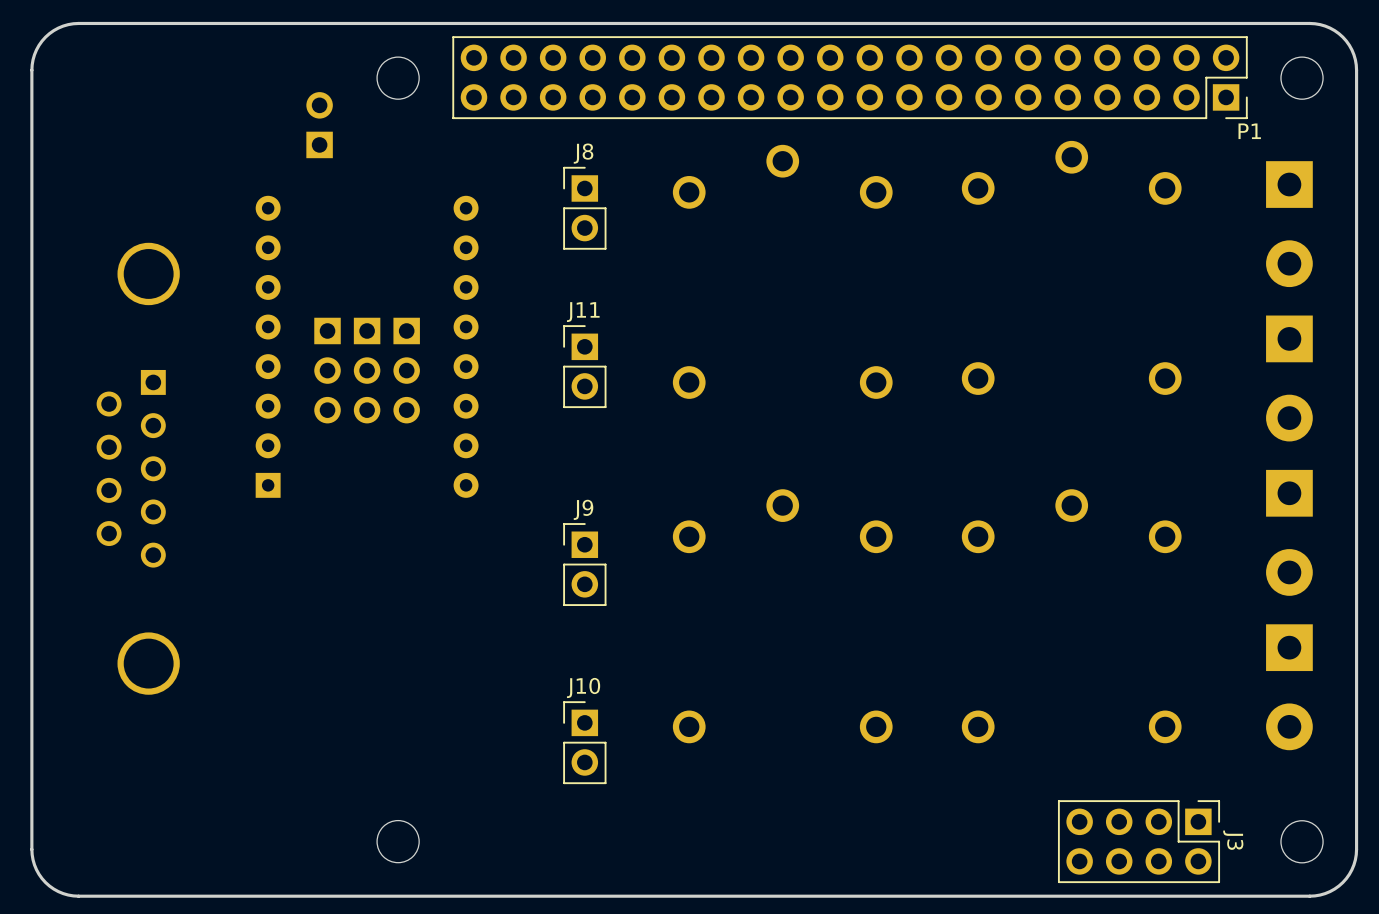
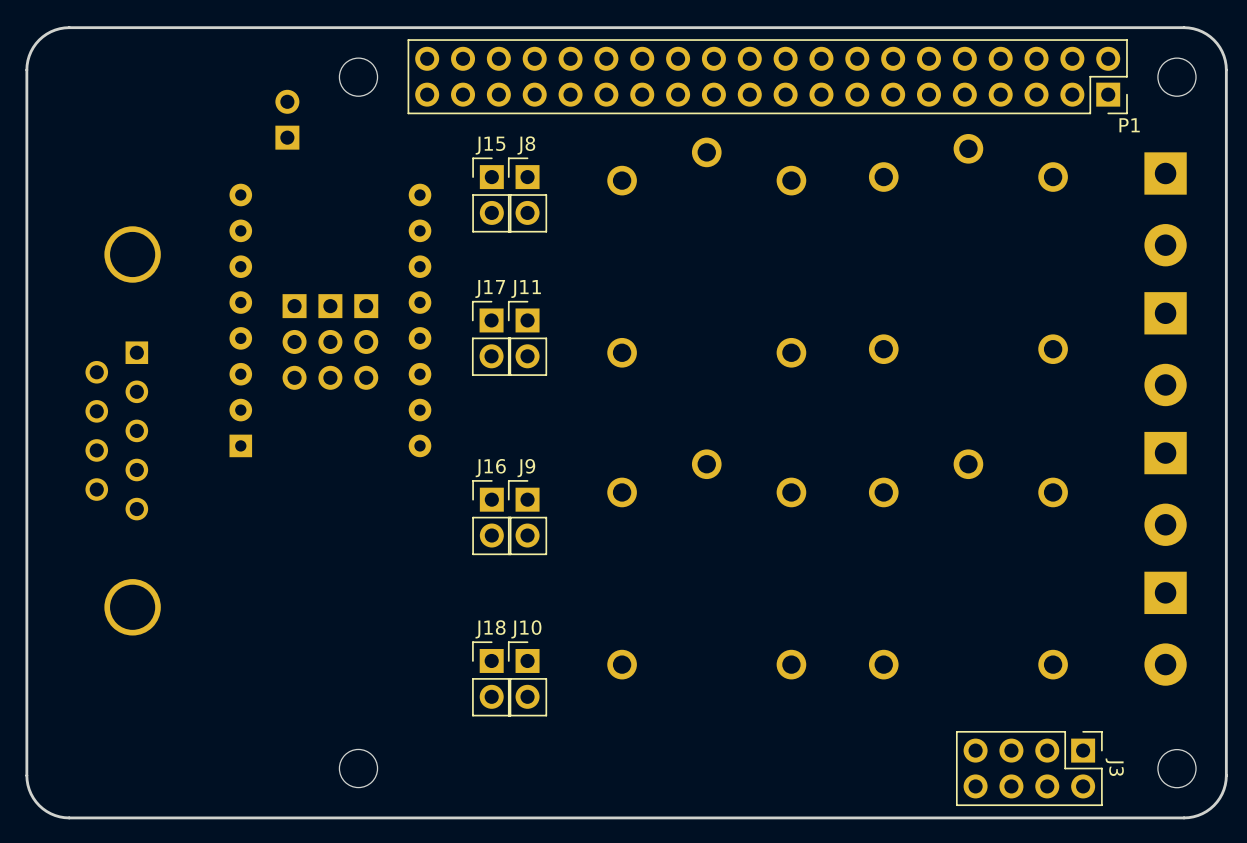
J15: none -> (491, 195)
J17: none -> (491, 338)
J16: none -> (491, 517)
J18: none -> (491, 678)

